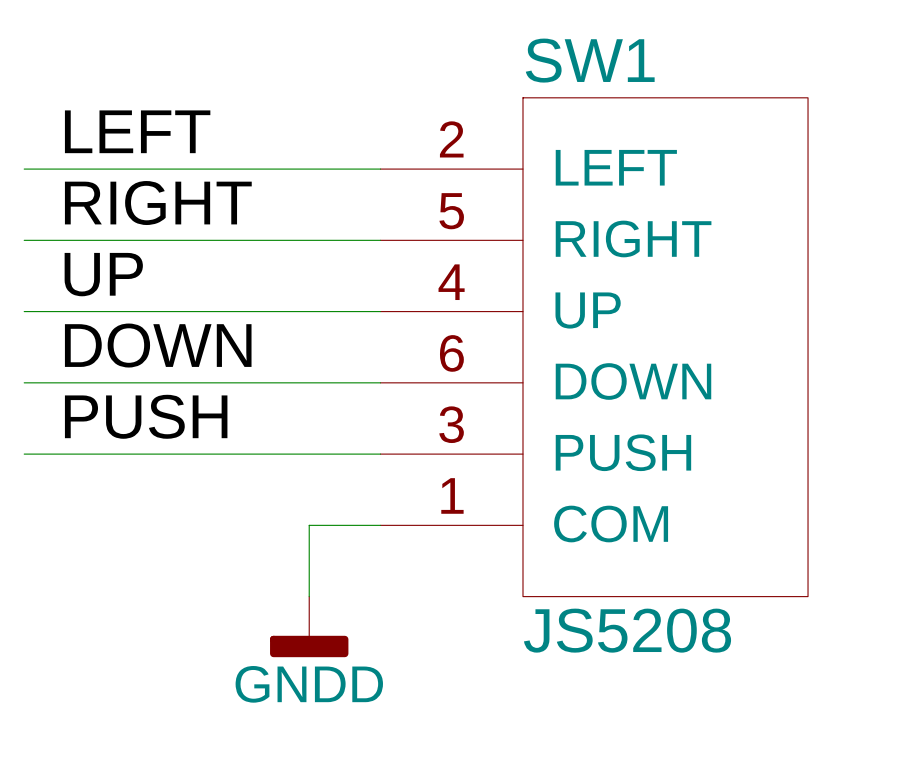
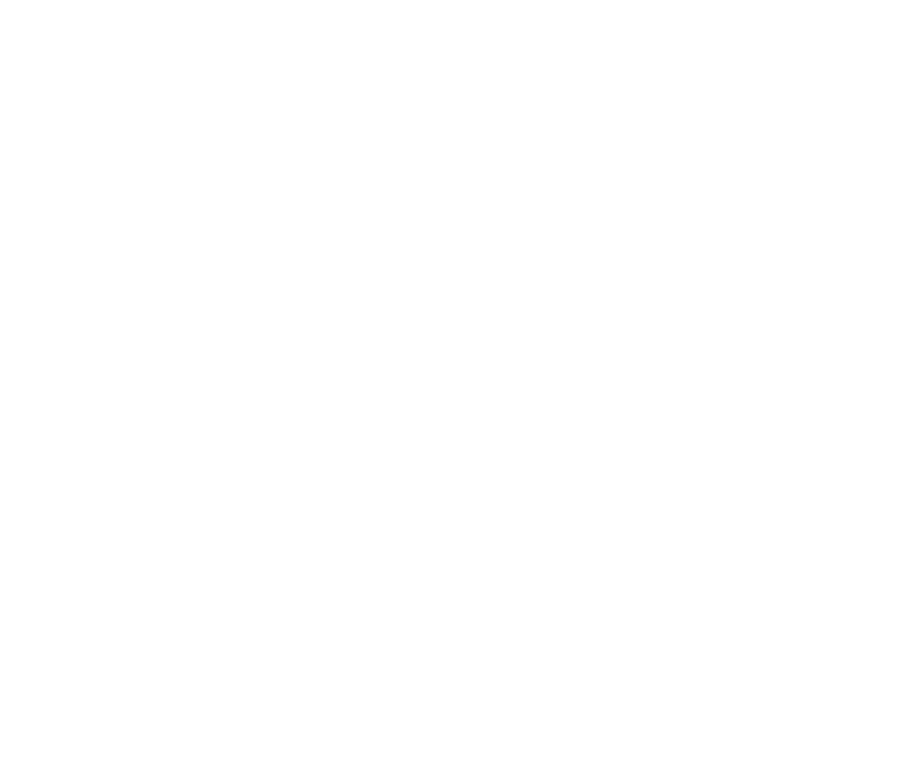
label: LEFT (137, 131) -> none
wire: (24, 169) (380, 169) -> none
label: RIGHT (158, 203) -> none
wire: (24, 240) (380, 240) -> none
label: UP (103, 274) -> none
wire: (24, 311) (380, 311) -> none
label: DOWN (158, 345) -> none
SW1: JS5208 (594, 347) -> none
wire: (24, 382) (380, 382) -> none
label: PUSH (146, 416) -> none
wire: (24, 454) (380, 454) -> none
wire: (380, 525) (309, 525) (309, 596) -> none
power symbol: GNDD (309, 626) -> none

